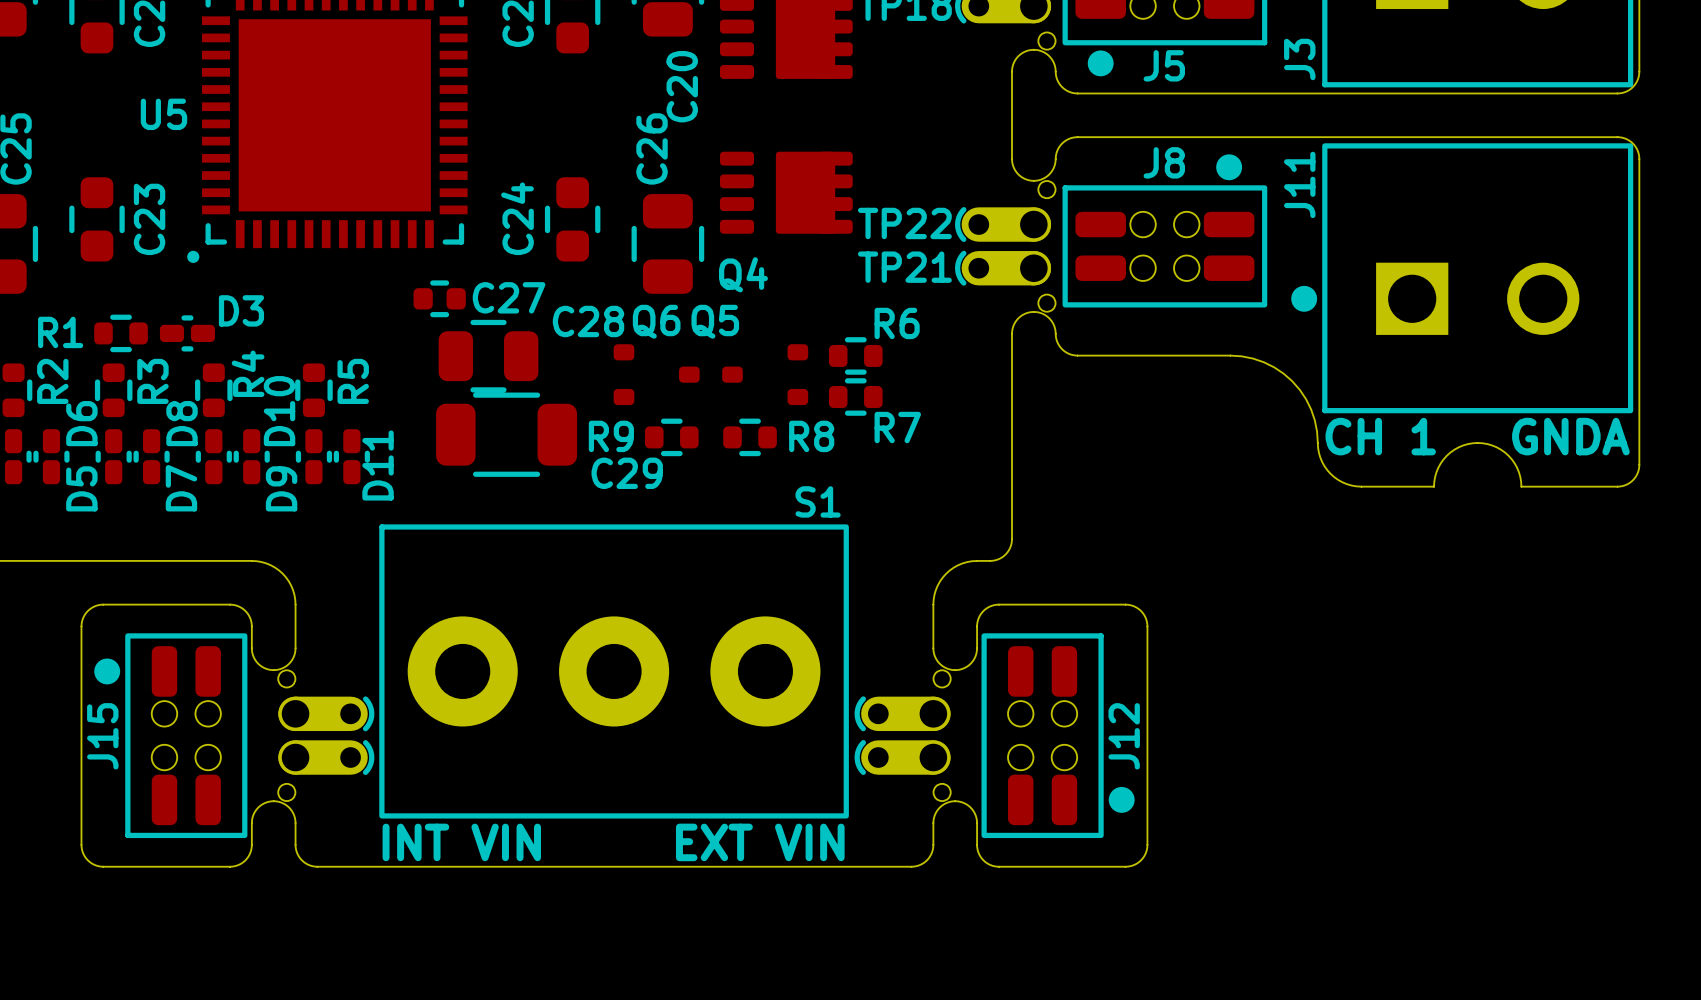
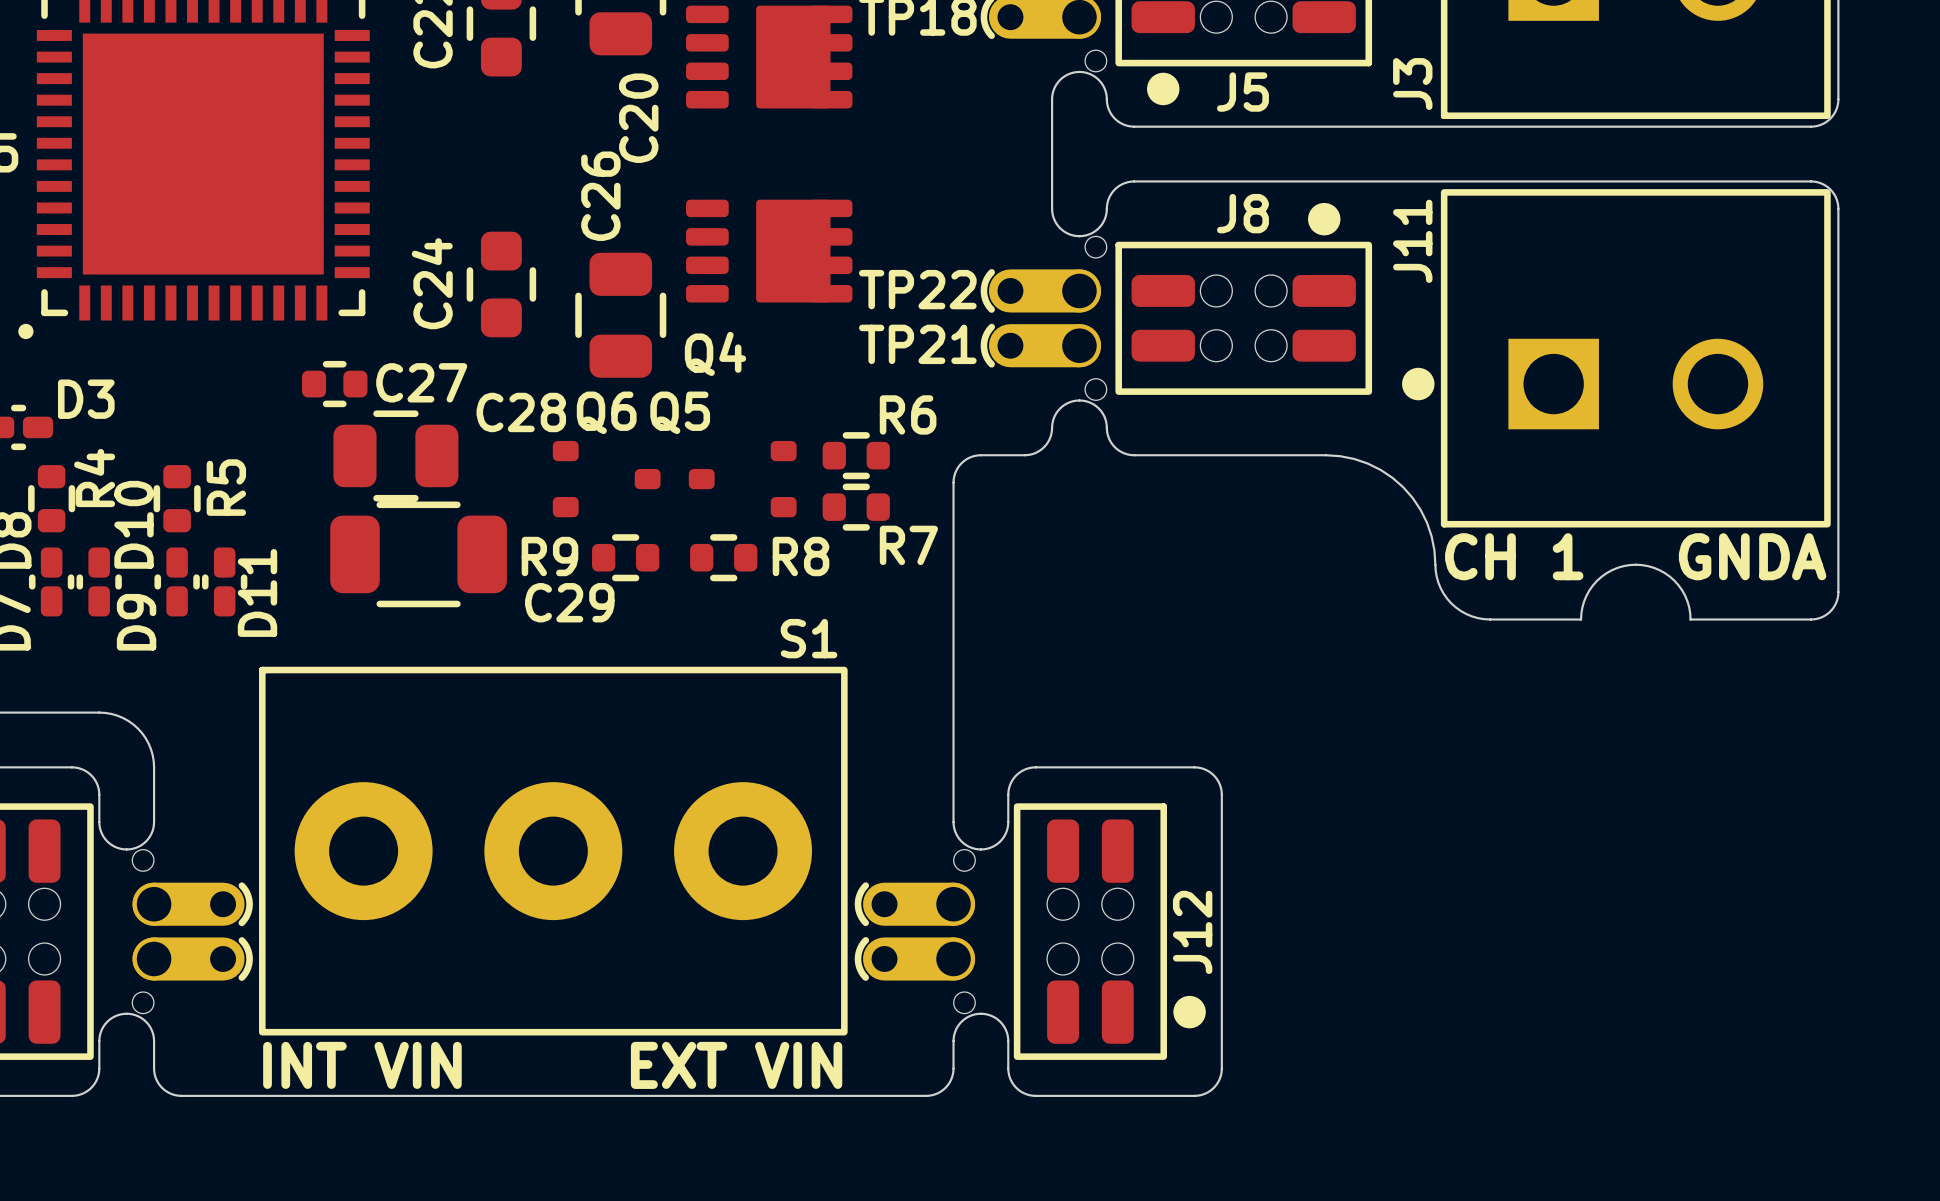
board edge: (1012, 333) (1010, 546) (1005, 554) (997, 559) (967, 562) (949, 570) (937, 585) (933, 604) -> (1052, 427) (1047, 442) (1036, 452) (1024, 455) (974, 455) (963, 461) (955, 473) (953, 767)

